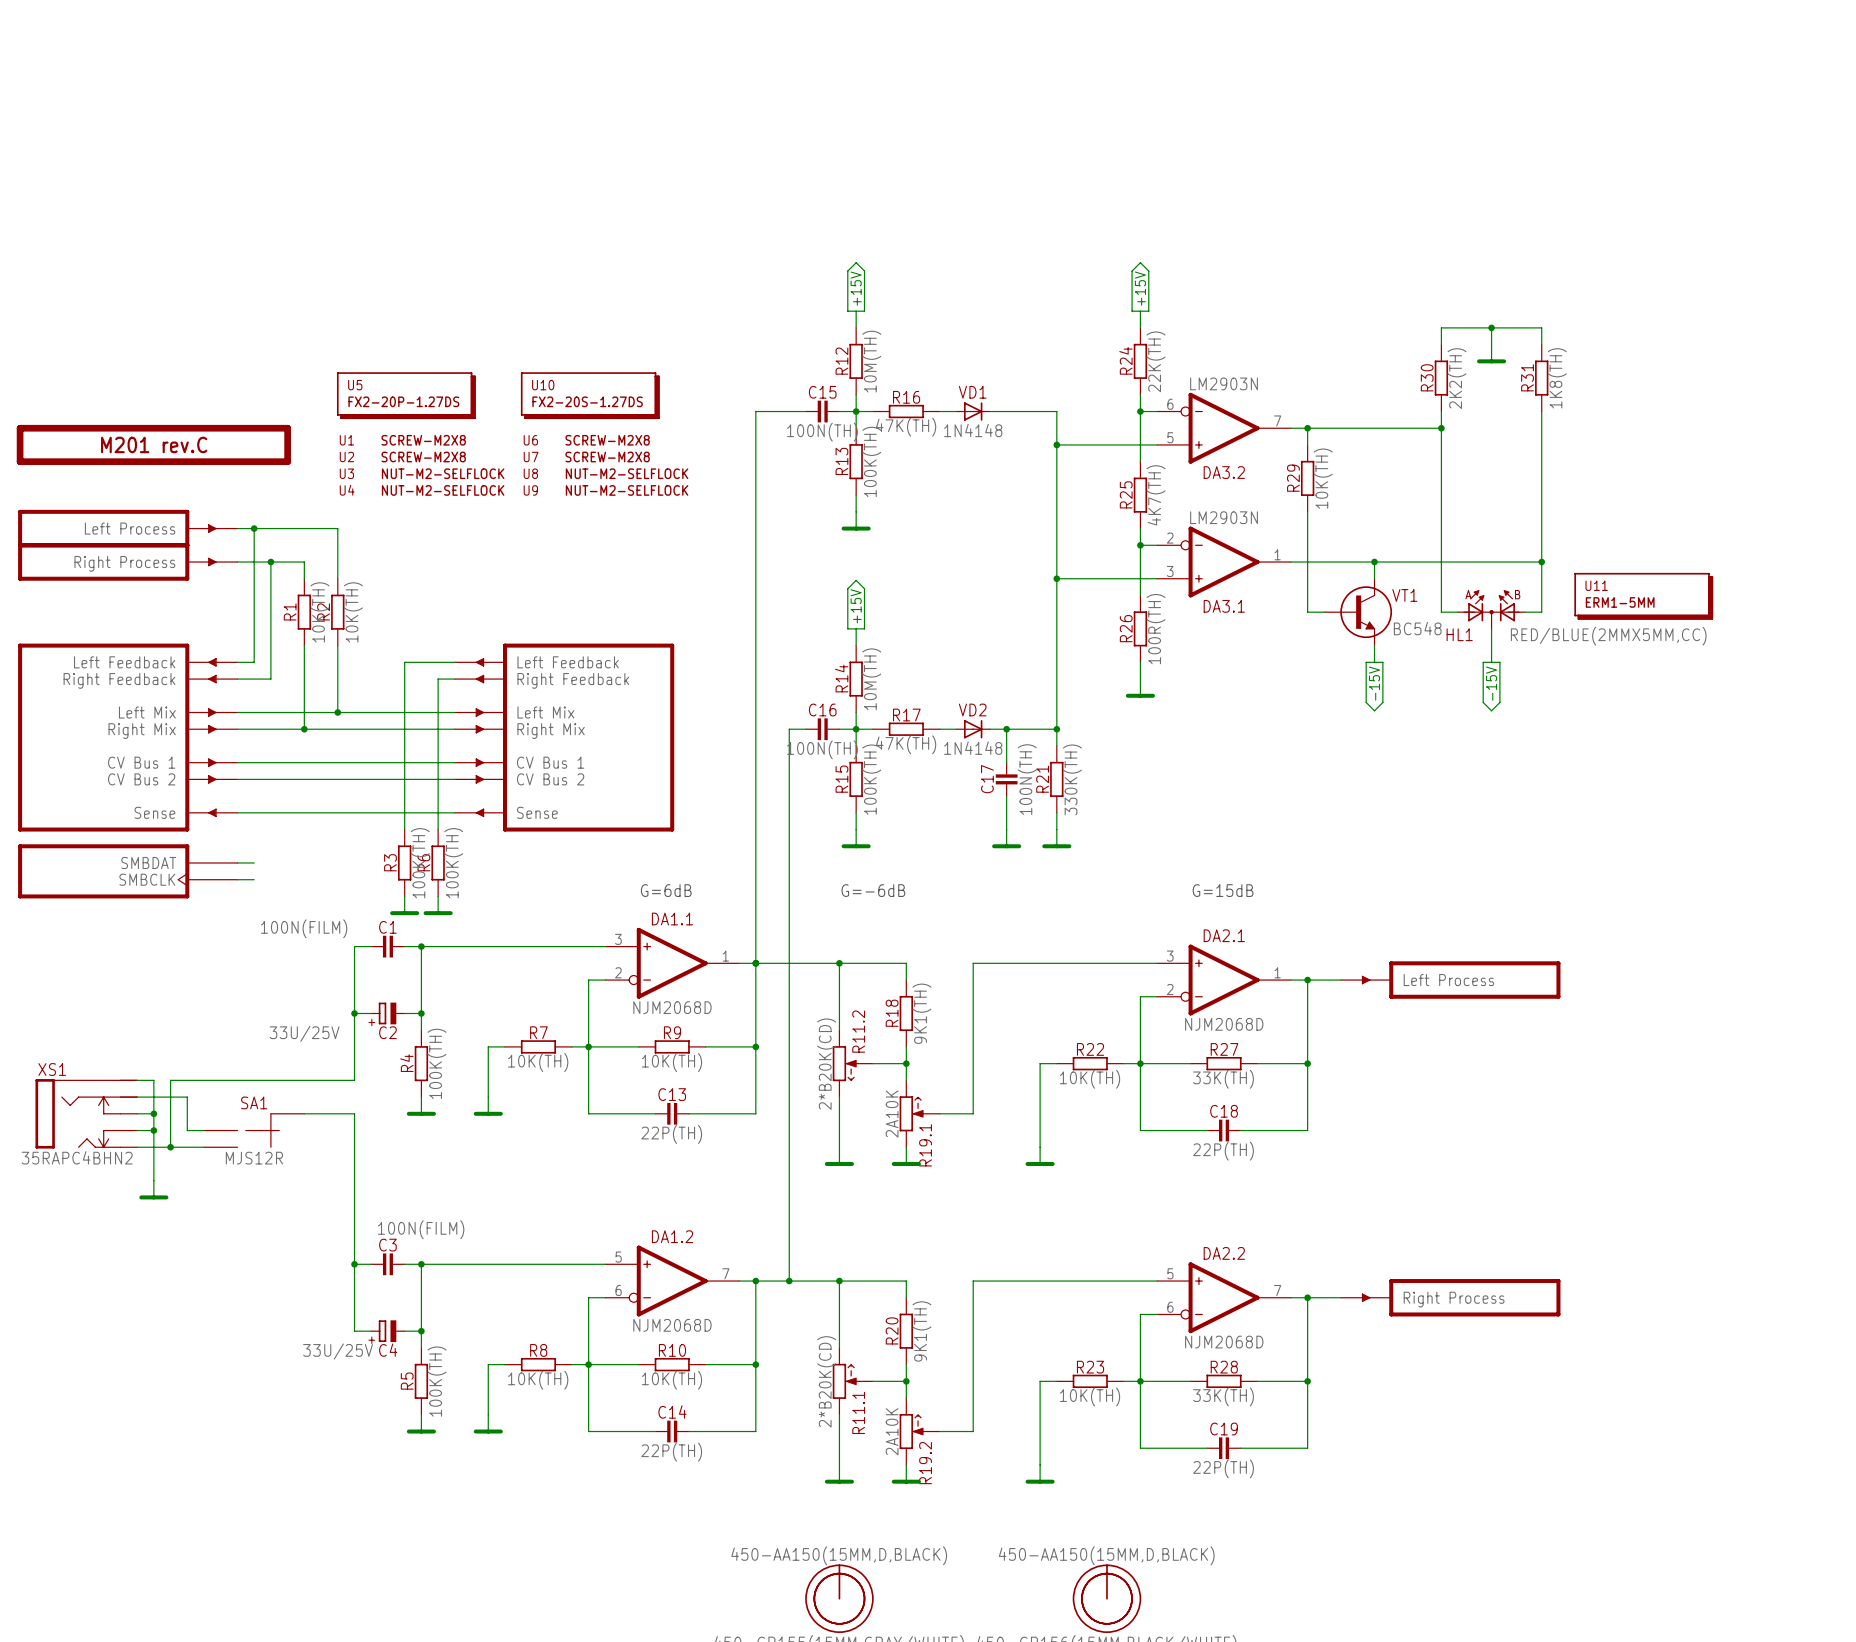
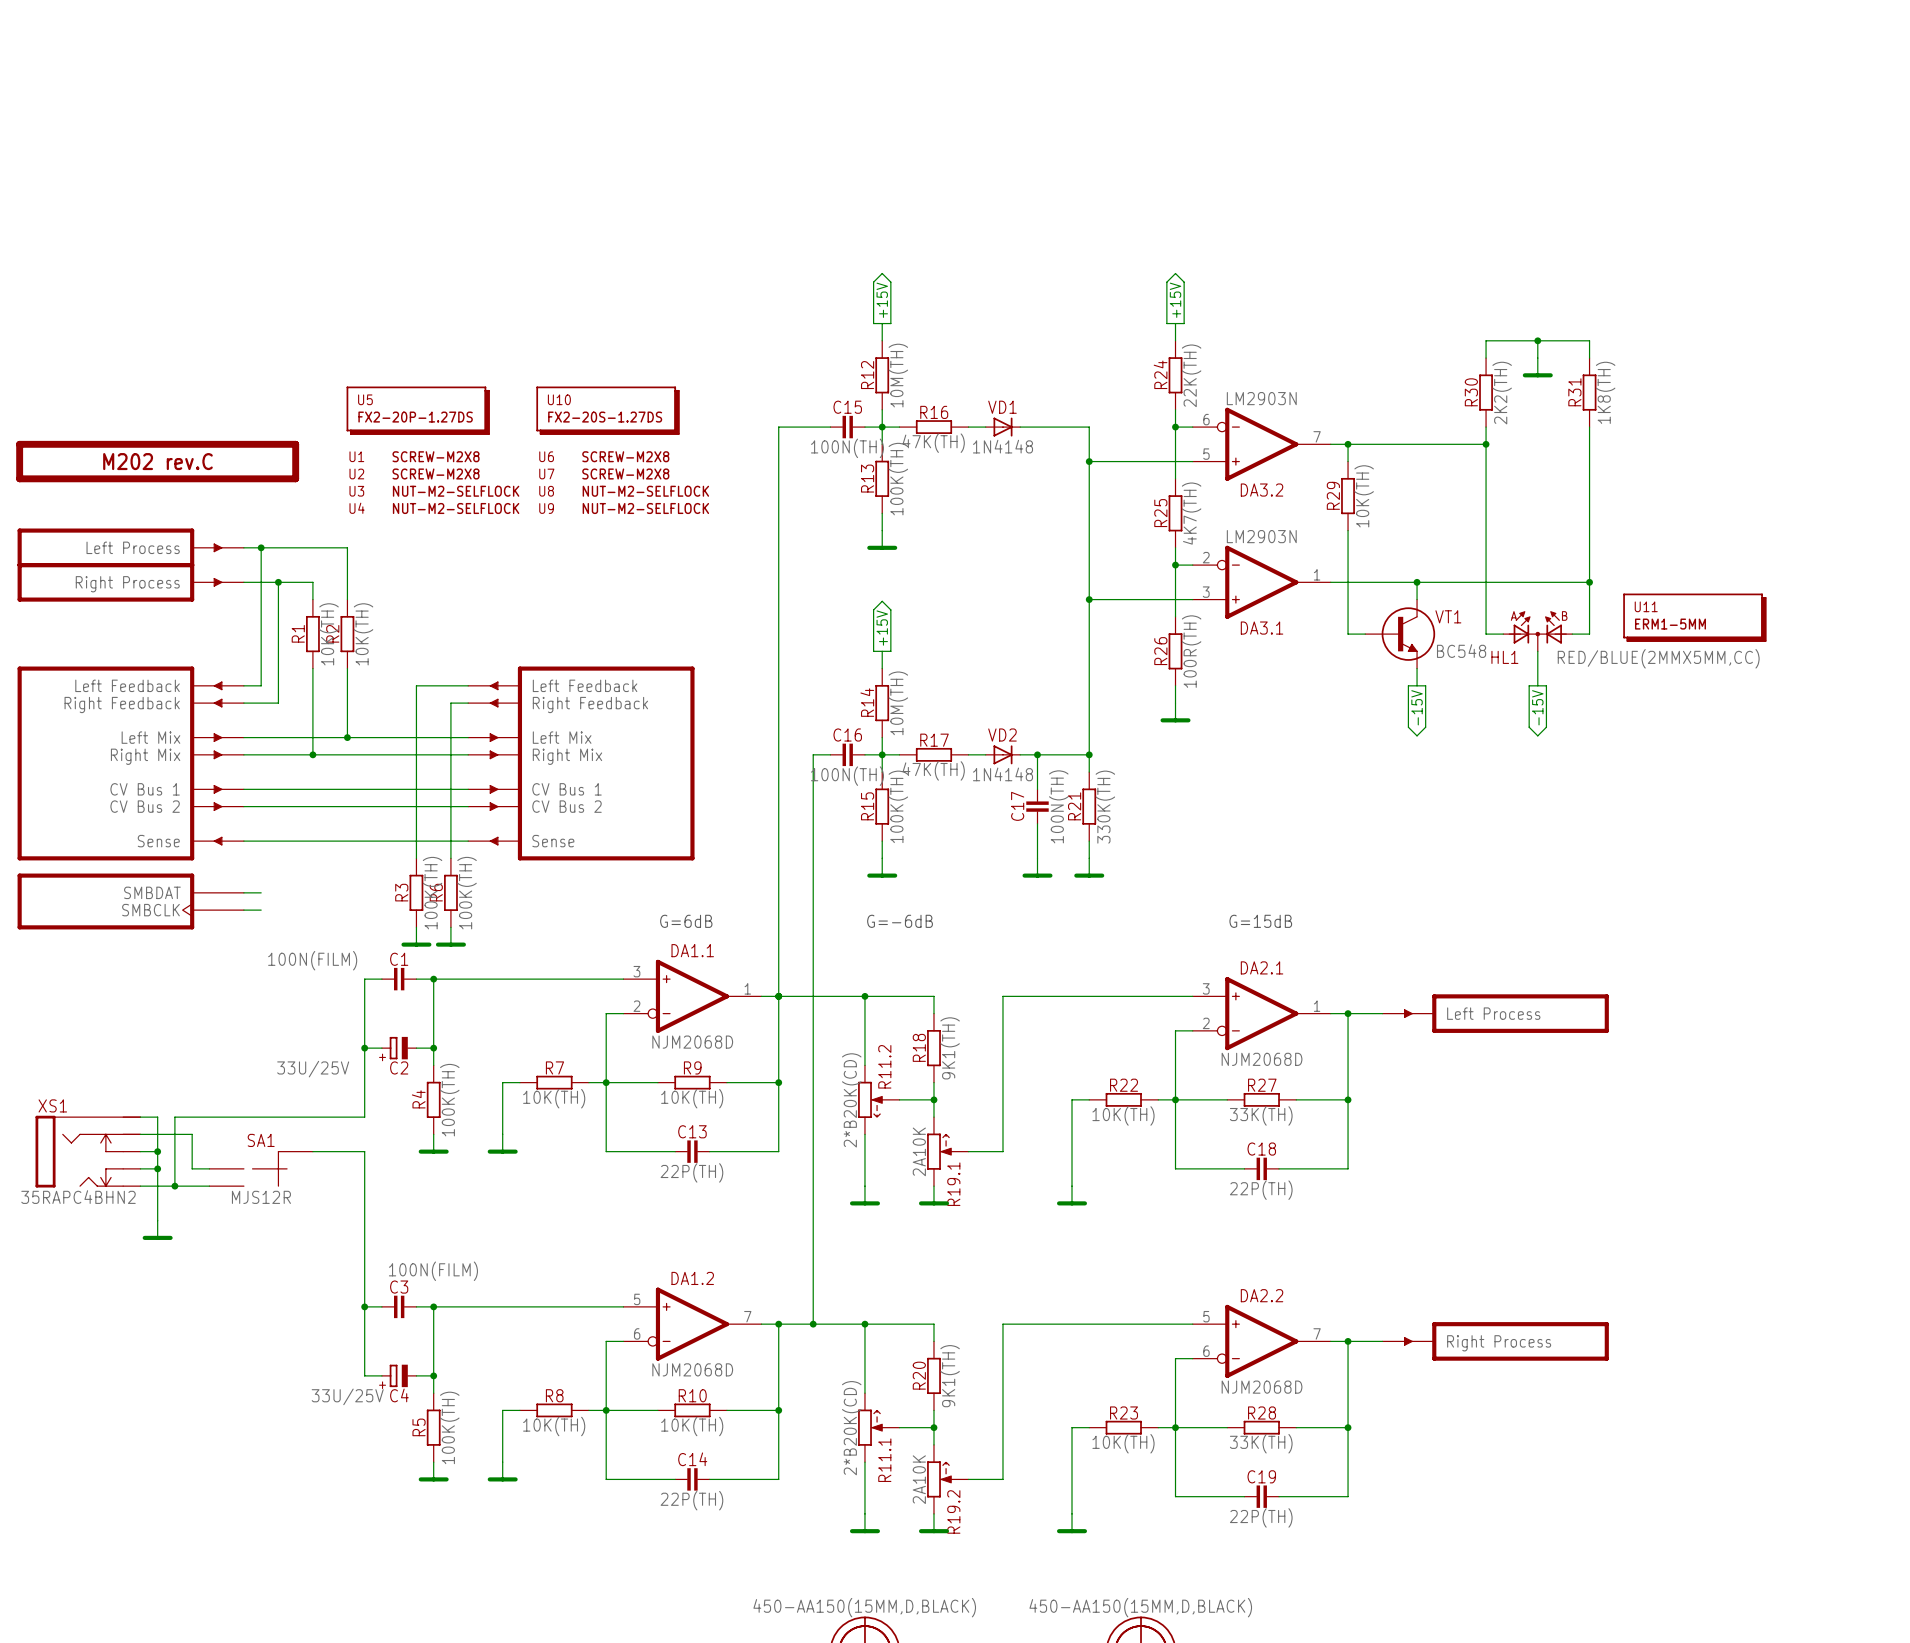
part value: M201 rev.C (154, 444) -> M202 rev.C (157, 461)

